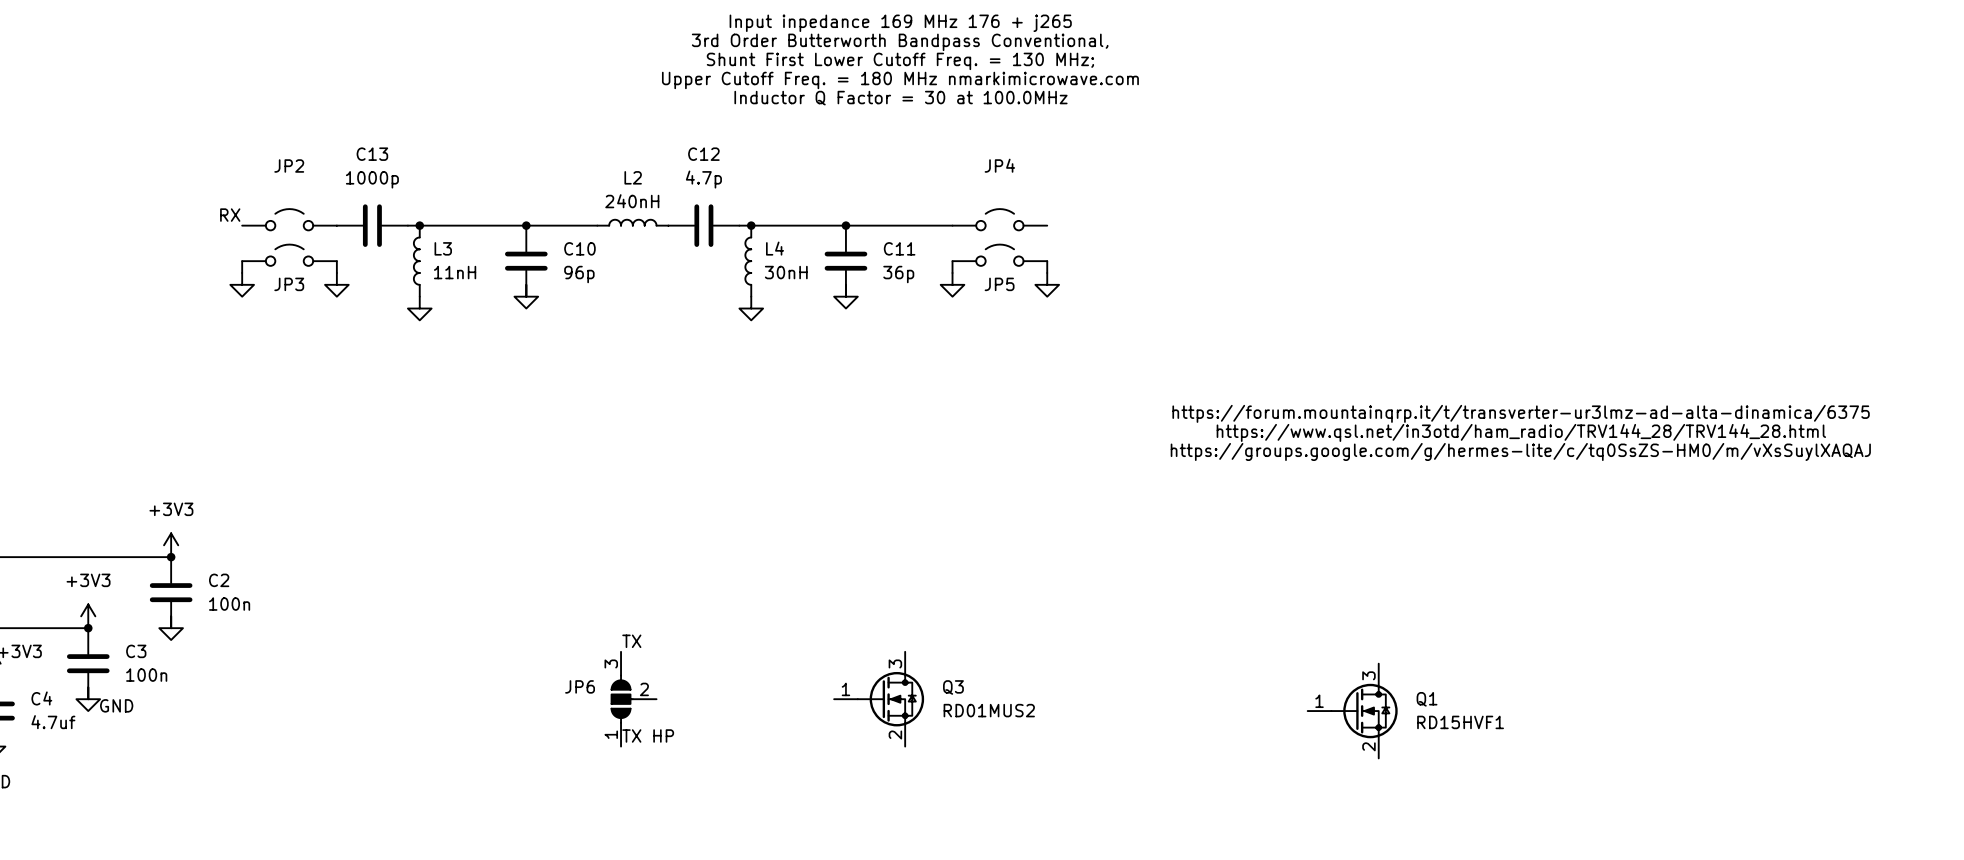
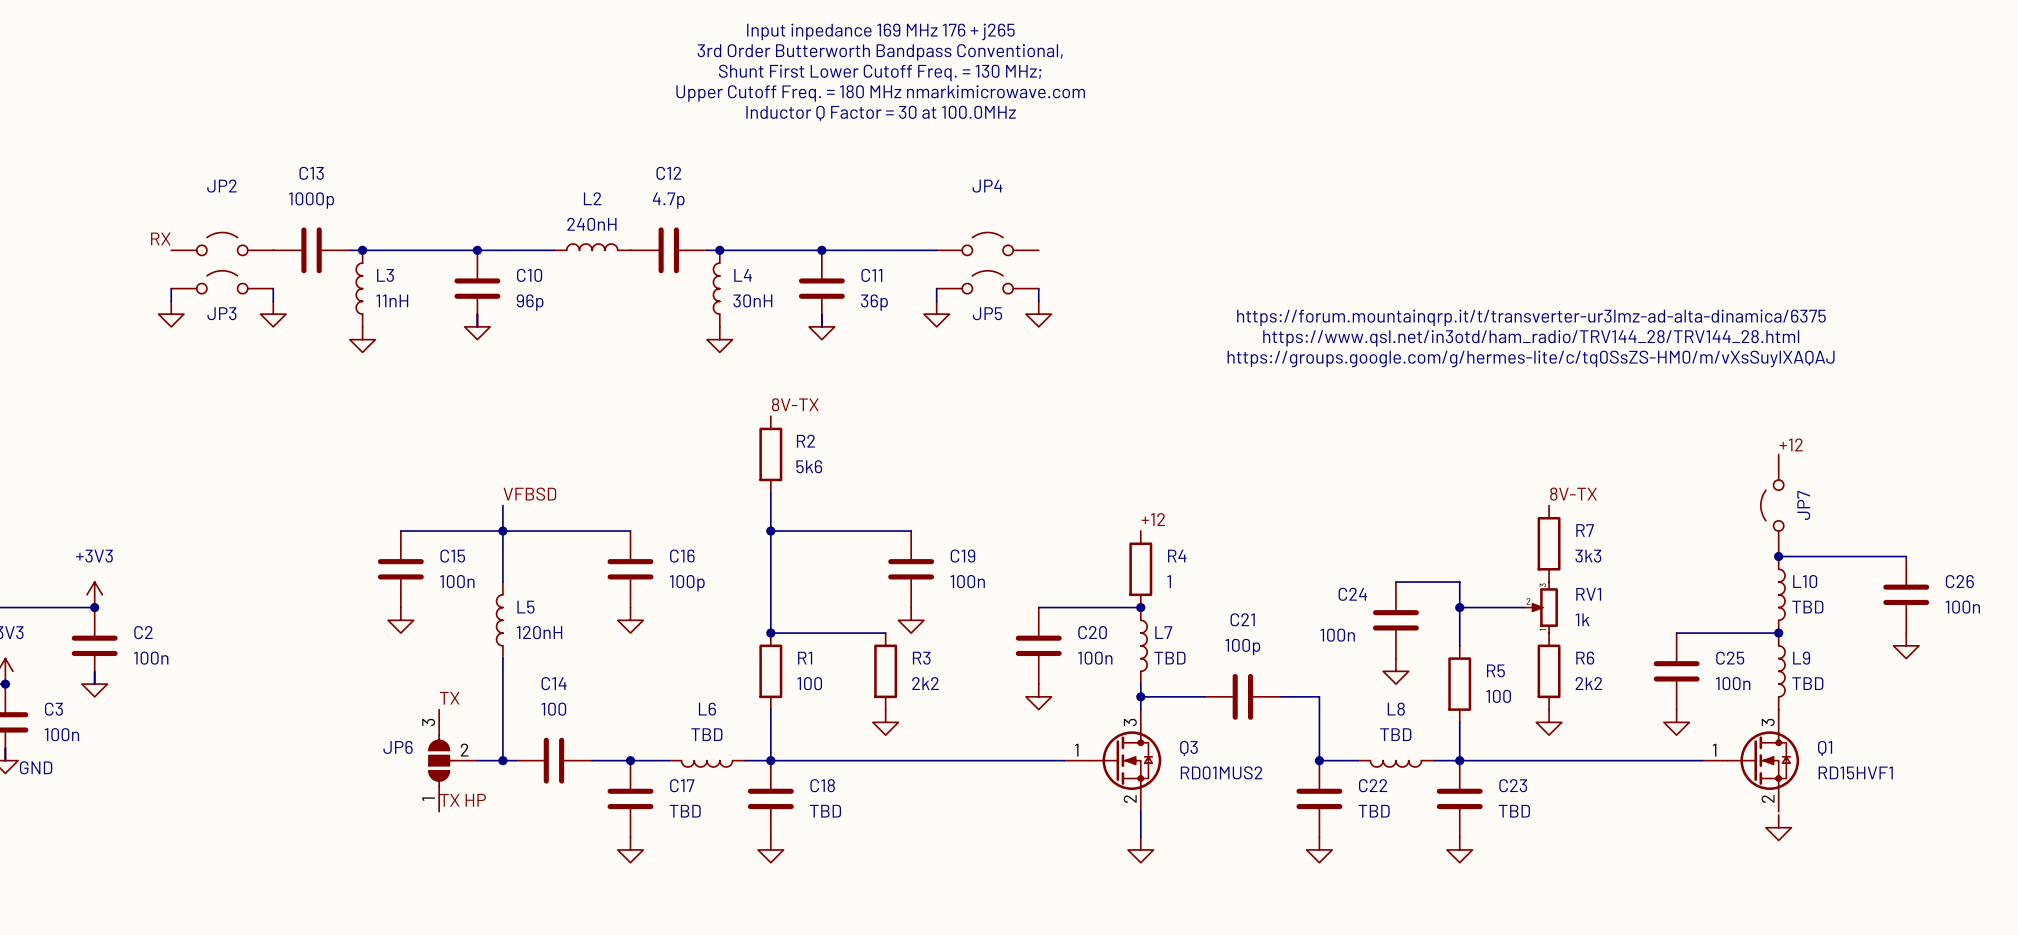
label: none -> 8V-TX (795, 404)
label: none -> +12 (1791, 444)
text position: https://forum.mountainqrp.it/t/transverter-ur3lmz-ad-alta-dinamica/6375 (1521, 413) -> https://forum.mountainqrp.it/t/transverter-ur3lmz-ad-alta-dinamica/6375 (1531, 317)
R2: none -> 5k6 (770, 454)
text position: https://www.qsl.net/in3otd/ham_radio/TRV144_28/TRV144_28.html (1521, 432) -> https://www.qsl.net/in3otd/ham_radio/TRV144_28/TRV144_28.html (1531, 338)
wire: none -> (770, 492) (770, 633) (885, 633)
label: none -> VFBSD (529, 494)
text position: https://groups.google.com/g/hermes-lite/c/tq0SsZS-HM0/m/vXsSuylXAQAJ (1520, 451) -> https://groups.google.com/g/hermes-lite/c/tq0SsZS-HM0/m/vXsSuylXAQAJ (1531, 358)
label: none -> 8V-TX (1573, 494)
wire: none -> (502, 505) (502, 582)
JP7: none -> (1772, 505)
label: none -> +12 (1153, 519)
wire: none -> (400, 531) (630, 531)
junction: none -> (502, 531)
wire: none -> (770, 531) (911, 531)
junction: none -> (770, 531)
R7: none -> 3k3 (1549, 543)
wire: none -> (1778, 556) (1906, 556)
junction: none -> (1778, 556)
C15: none -> 100n (400, 569)
C16: none -> 100p (630, 569)
C19: none -> 100n (911, 569)
R4: none -> 1 (1140, 569)
wire: none -> (1395, 582) (1459, 582) (1459, 645)
L10: none -> TBD (1781, 594)
C26: none -> 100n (1906, 594)
wire: none -> (1038, 607) (1140, 607)
junction: none -> (1140, 607)
wire: none -> (1459, 607) (1523, 607)
junction: none -> (1459, 607)
RV1: none -> 1k (1540, 607)
power symbol: none -> (400, 620)
L5: none -> 120nH (499, 620)
power symbol: none -> (630, 620)
power symbol: none -> (911, 620)
C24: none -> 100n (1395, 620)
junction: none -> (770, 633)
wire: none -> (1676, 633) (1778, 633)
junction: none -> (1778, 633)
C20: none -> 100n (1038, 645)
L7: none -> TBD (1143, 645)
power symbol: none -> (1906, 645)
wire: none -> (502, 658) (502, 760)
R1: none -> 100 (770, 671)
R3: none -> 2k2 (885, 671)
power symbol: none -> (1395, 671)
R6: none -> 2k2 (1549, 671)
C25: none -> 100n (1676, 671)
L9: none -> TBD (1781, 671)
wire: none -> (1140, 684) (1140, 709)
R5: none -> 100 (1459, 684)
power symbol: none -> (1038, 696)
wire: none -> (1140, 696) (1204, 696)
junction: none -> (1140, 696)
C21: none -> 100p (1242, 696)
wire: none -> (1281, 696) (1319, 696) (1319, 760) (1357, 760)
label position: TX (631, 641) -> TX (449, 698)
wire: none -> (770, 709) (770, 760)
power symbol: none -> (885, 722)
wire: none -> (1459, 722) (1459, 760)
power symbol: none -> (1549, 722)
power symbol: none -> (1676, 722)
wire: none -> (477, 760) (515, 760)
junction: none -> (502, 760)
C14: none -> 100 (553, 760)
wire: none -> (592, 760) (668, 760)
JP6 position: (634, 699) -> (453, 760)
junction: none -> (630, 760)
wire: none -> (745, 760) (1064, 760)
junction: none -> (770, 760)
Q3 position: (879, 699) -> (1112, 760)
junction: none -> (1319, 760)
wire: none -> (1434, 760) (1702, 760)
junction: none -> (1459, 760)
L6: none -> TBD (707, 763)
L8: none -> TBD (1395, 763)
Q1 position: (1352, 711) -> (1750, 760)
C17: none -> TBD (630, 798)
C18: none -> TBD (770, 798)
C22: none -> TBD (1319, 798)
C23: none -> TBD (1459, 798)
label position: TX HP (648, 735) -> TX HP (462, 800)
wire: none -> (1140, 811) (1140, 837)
power symbol: none -> (1778, 827)
power symbol: none -> (630, 849)
power symbol: none -> (770, 849)
power symbol: none -> (1140, 849)
power symbol: none -> (1319, 849)
power symbol: none -> (1459, 849)

